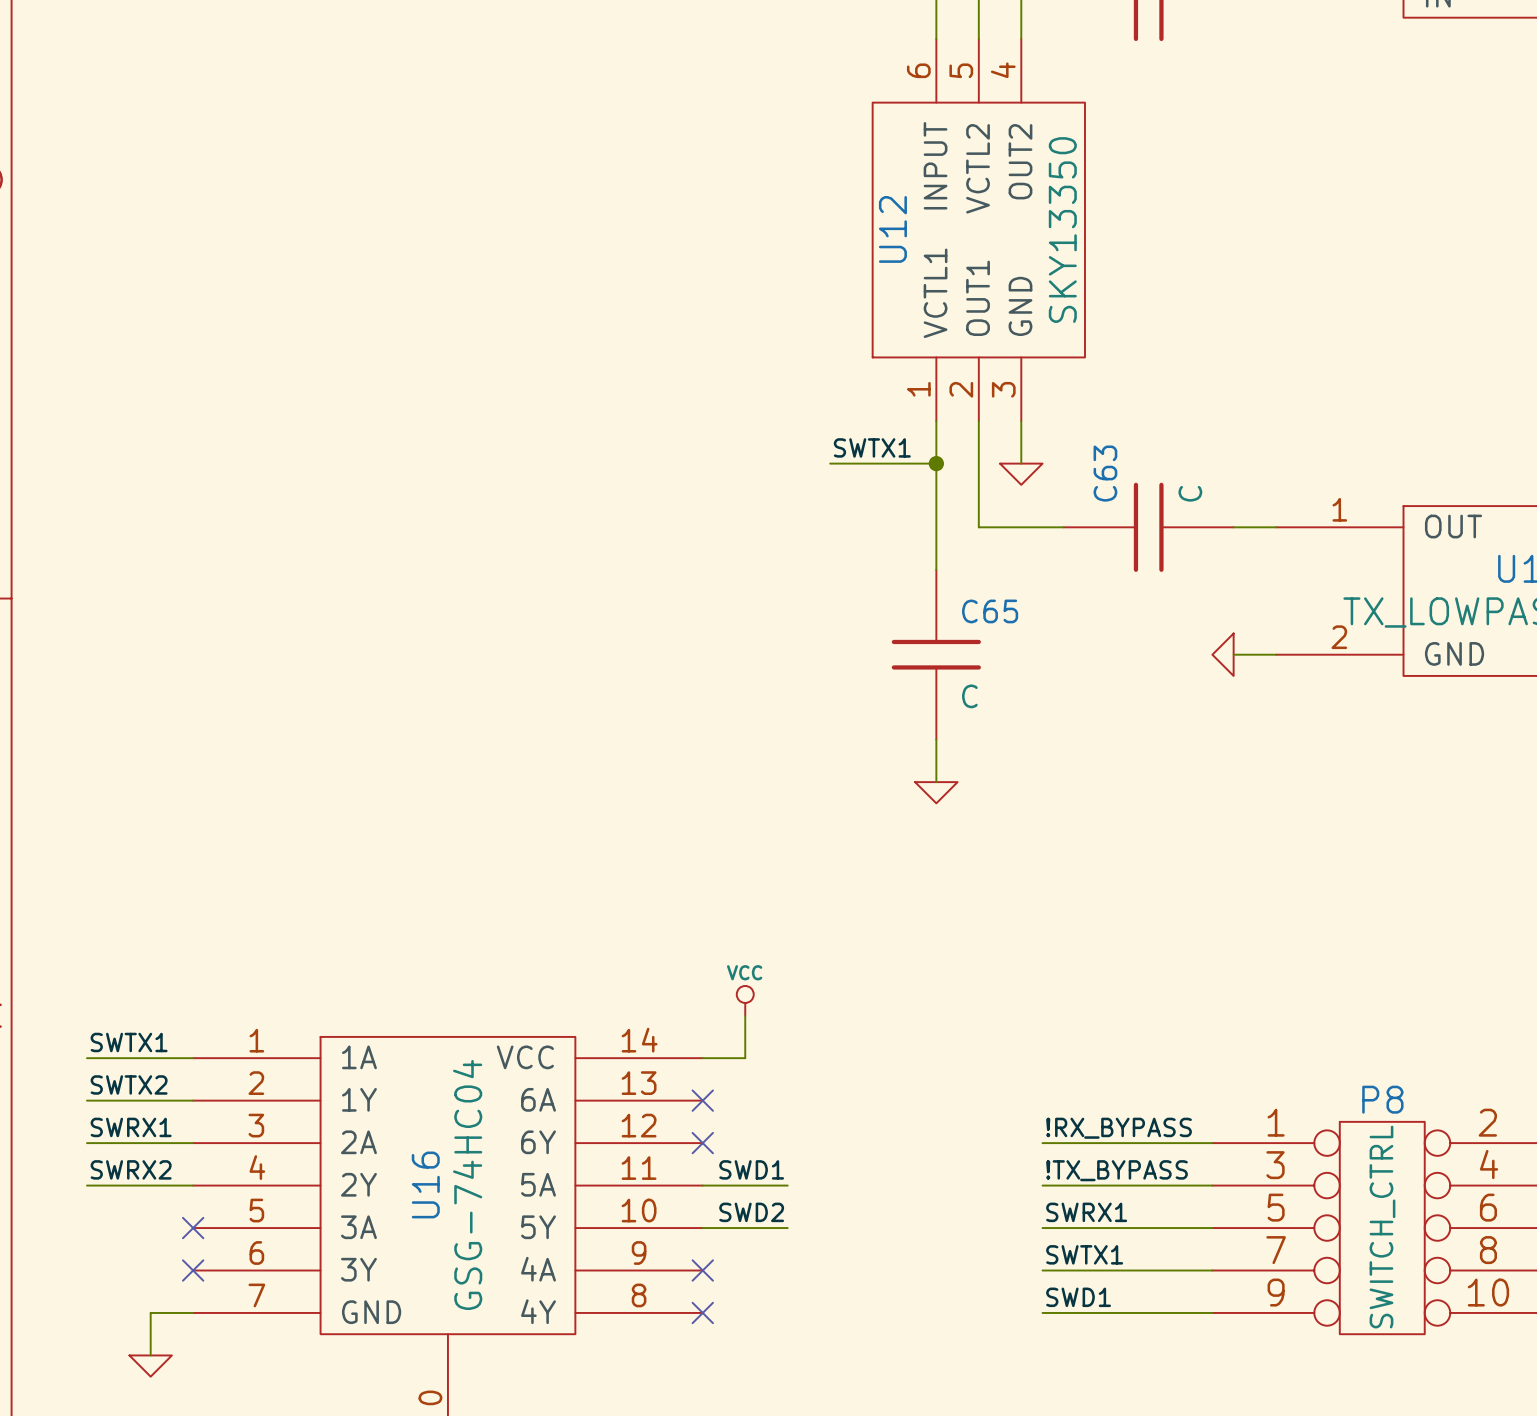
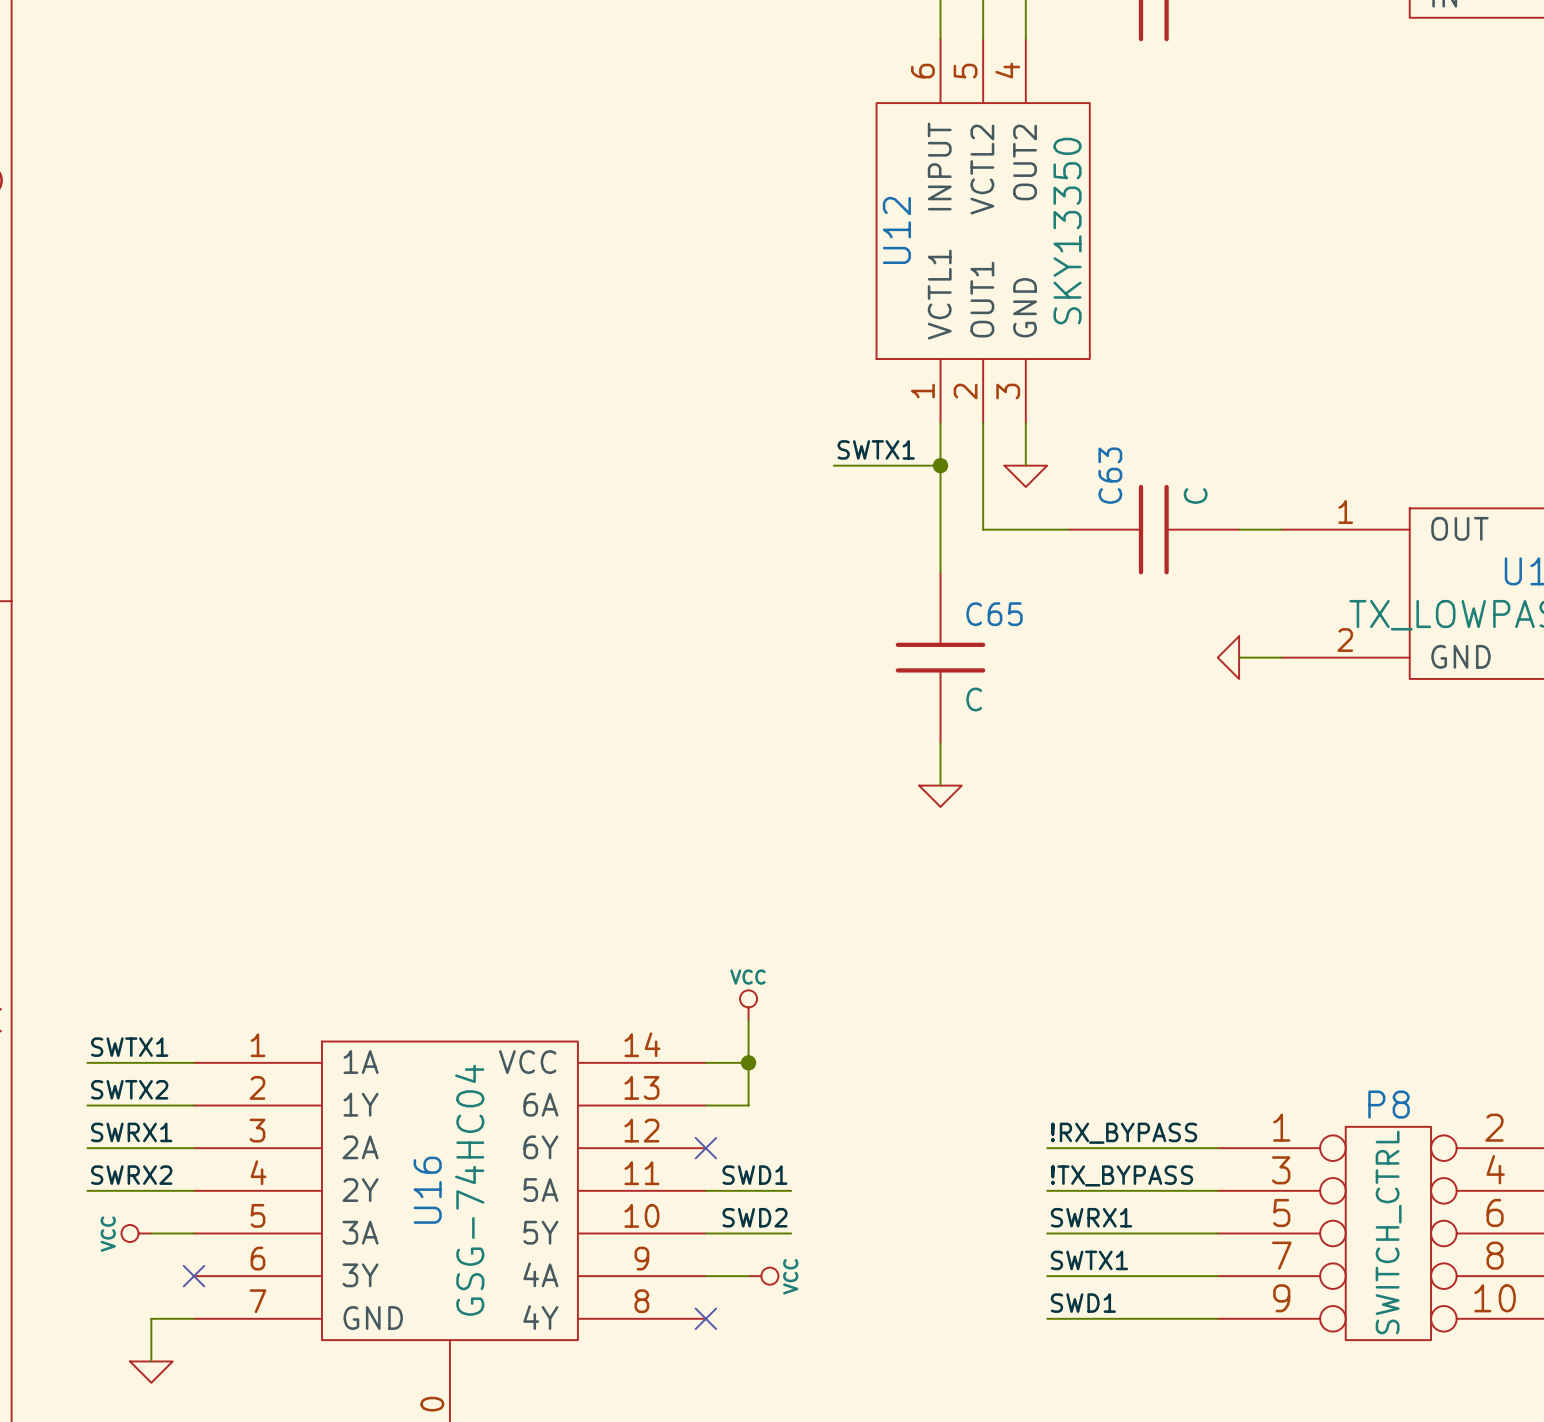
wire: none -> (748, 1062) (748, 1105) (705, 1105)
junction: none -> (748, 1062)
no-connect mark: (702, 1100) -> none
power symbol: none -> VCC (136, 1233)
wire: none -> (151, 1233) (194, 1233)
no-connect mark: (193, 1228) -> none
wire: none -> (705, 1276) (748, 1276)
no-connect mark: (702, 1270) -> none
power symbol: none -> VCC (763, 1276)

